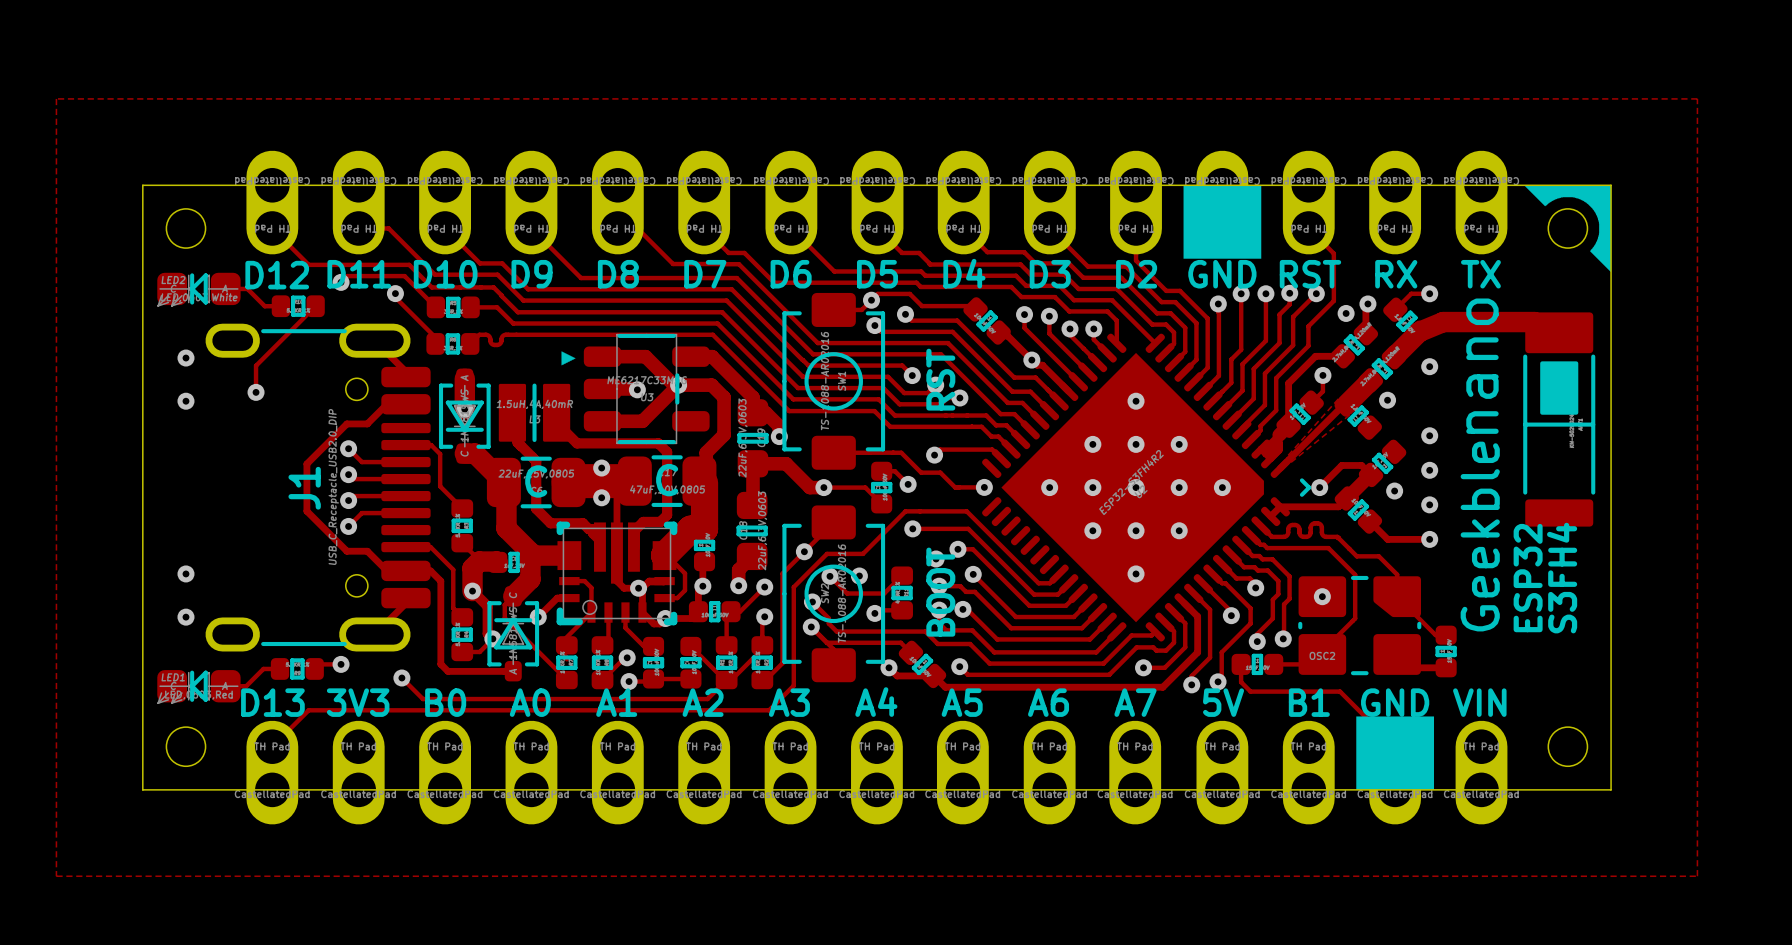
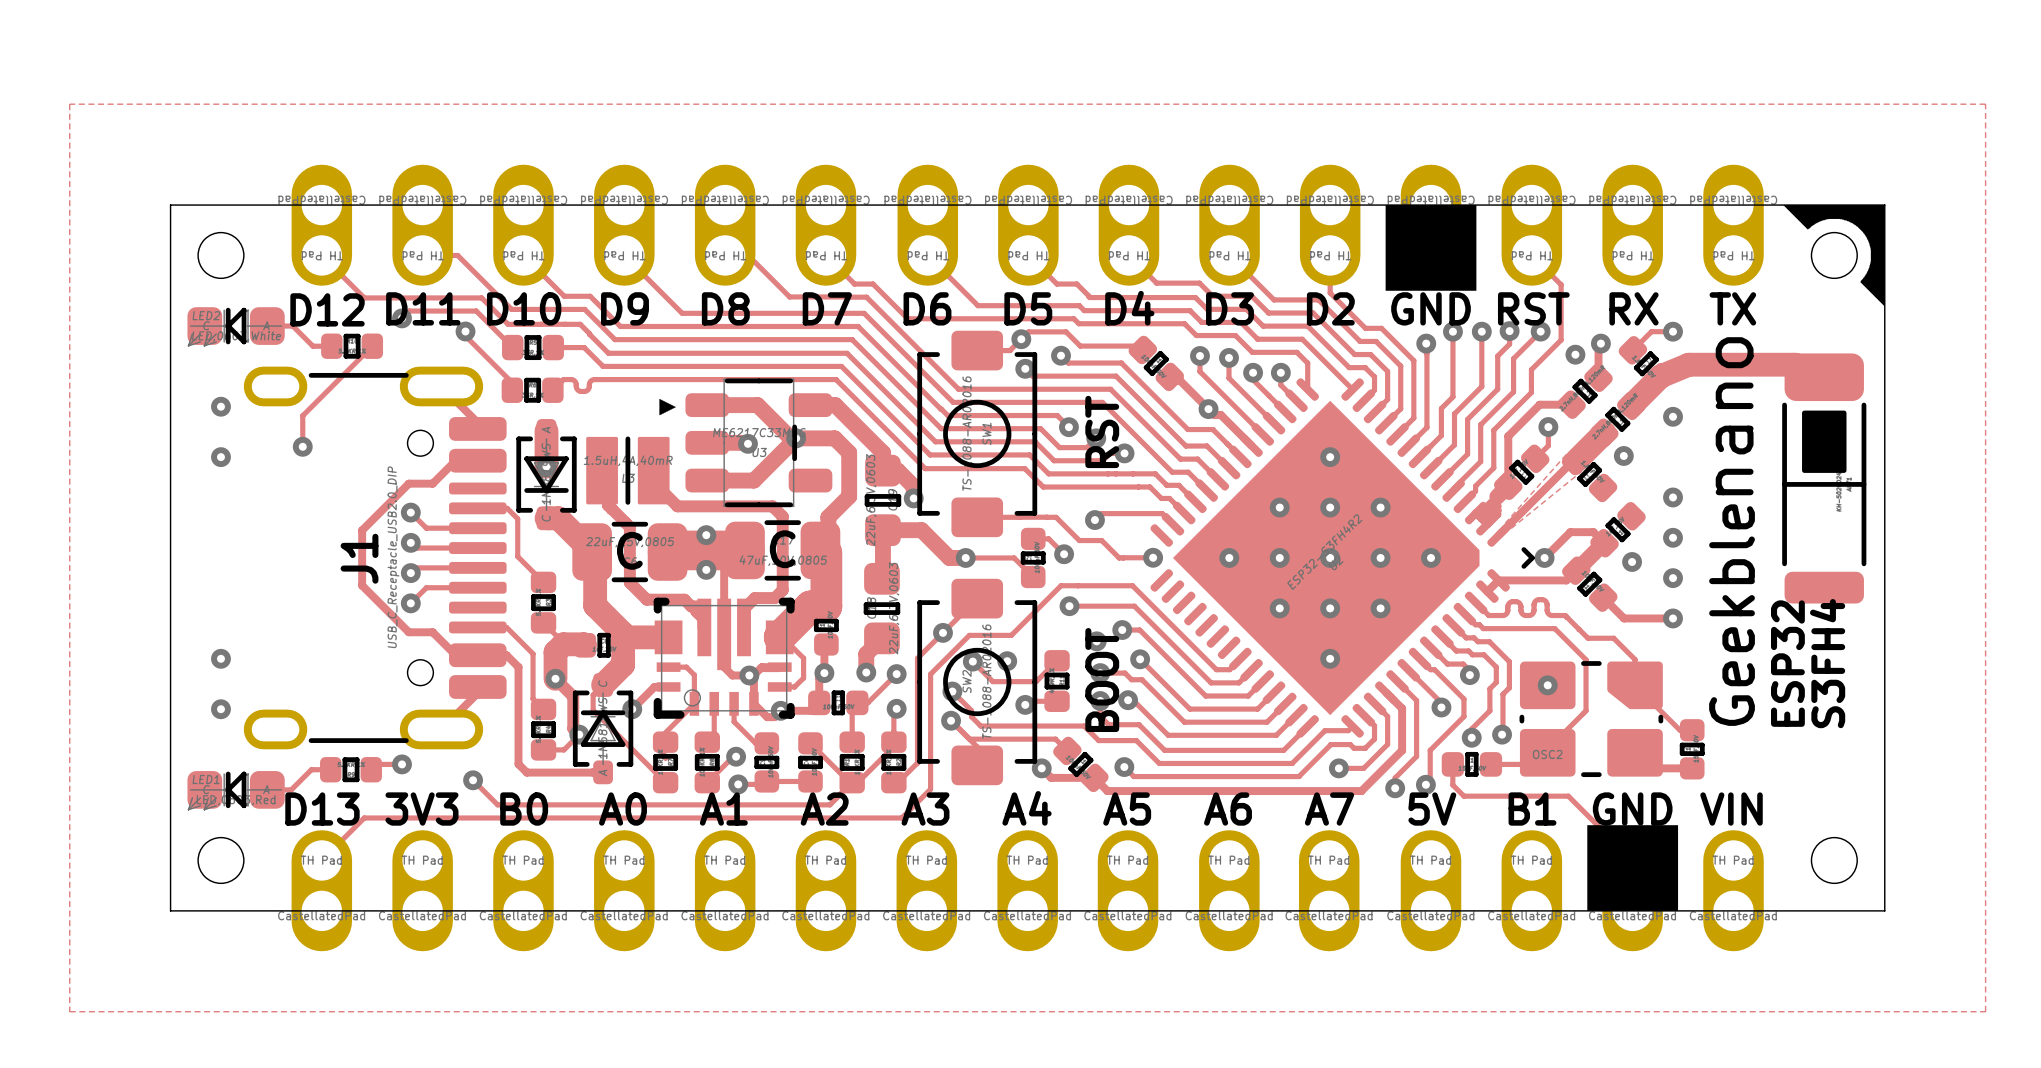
part footprint: [1523, 312, 1596, 527] -> [1782, 353, 1867, 604]

